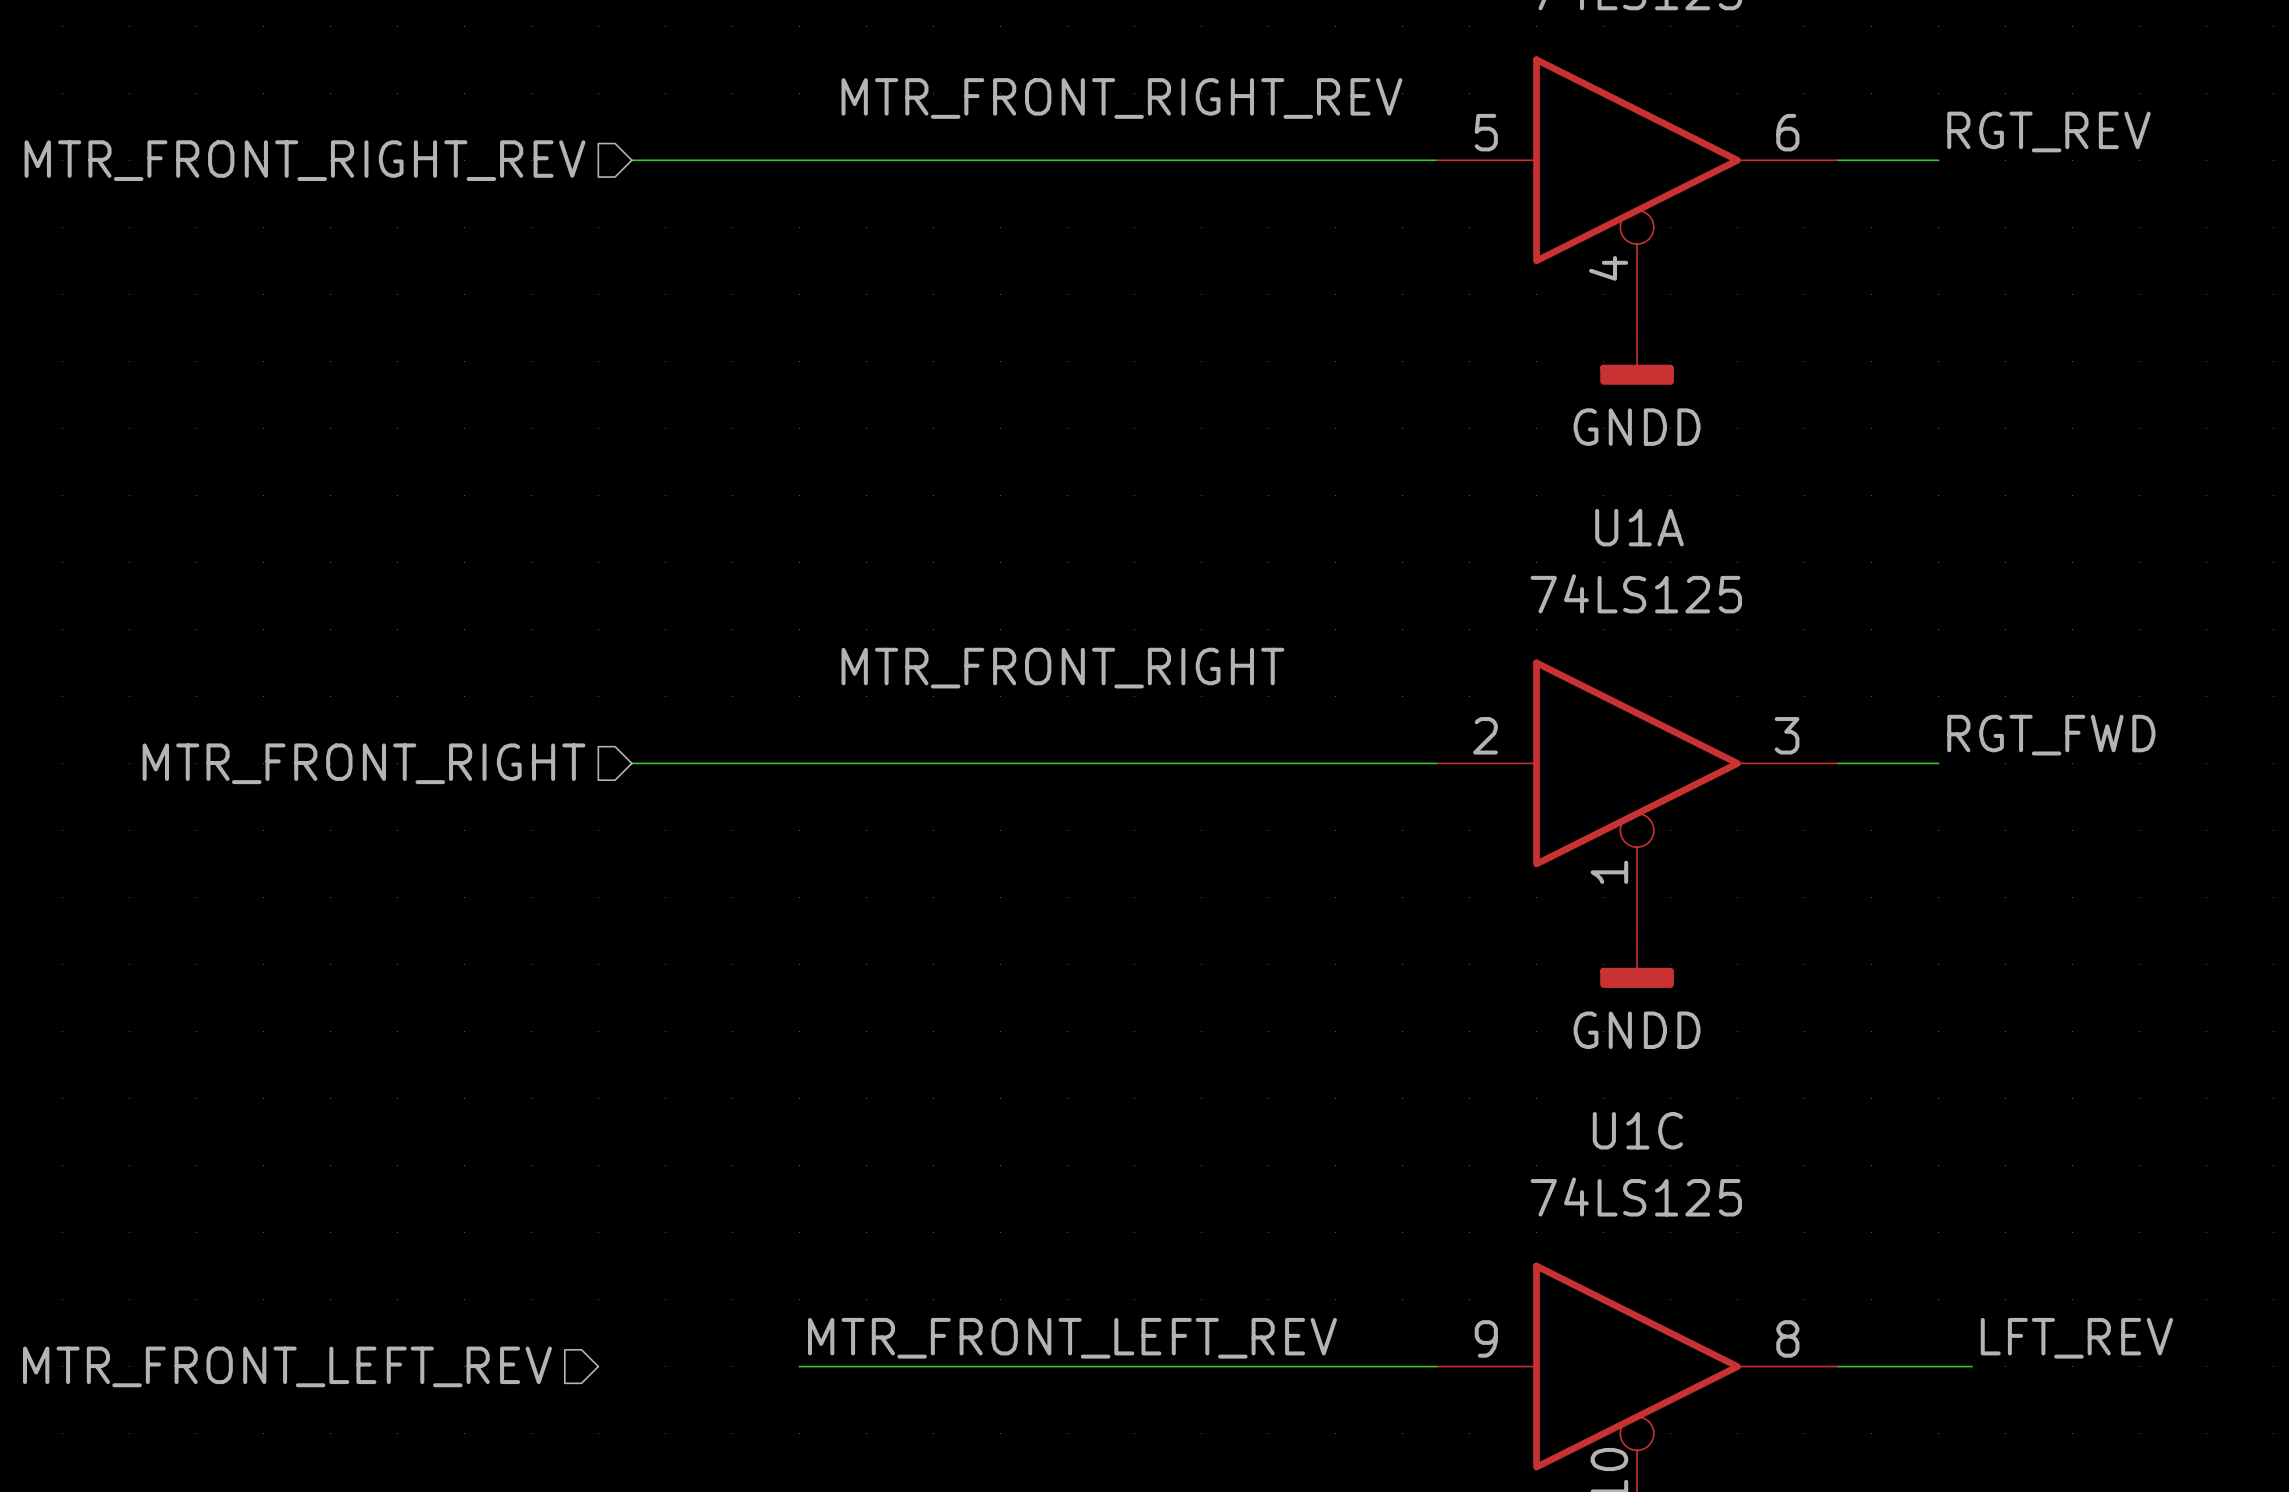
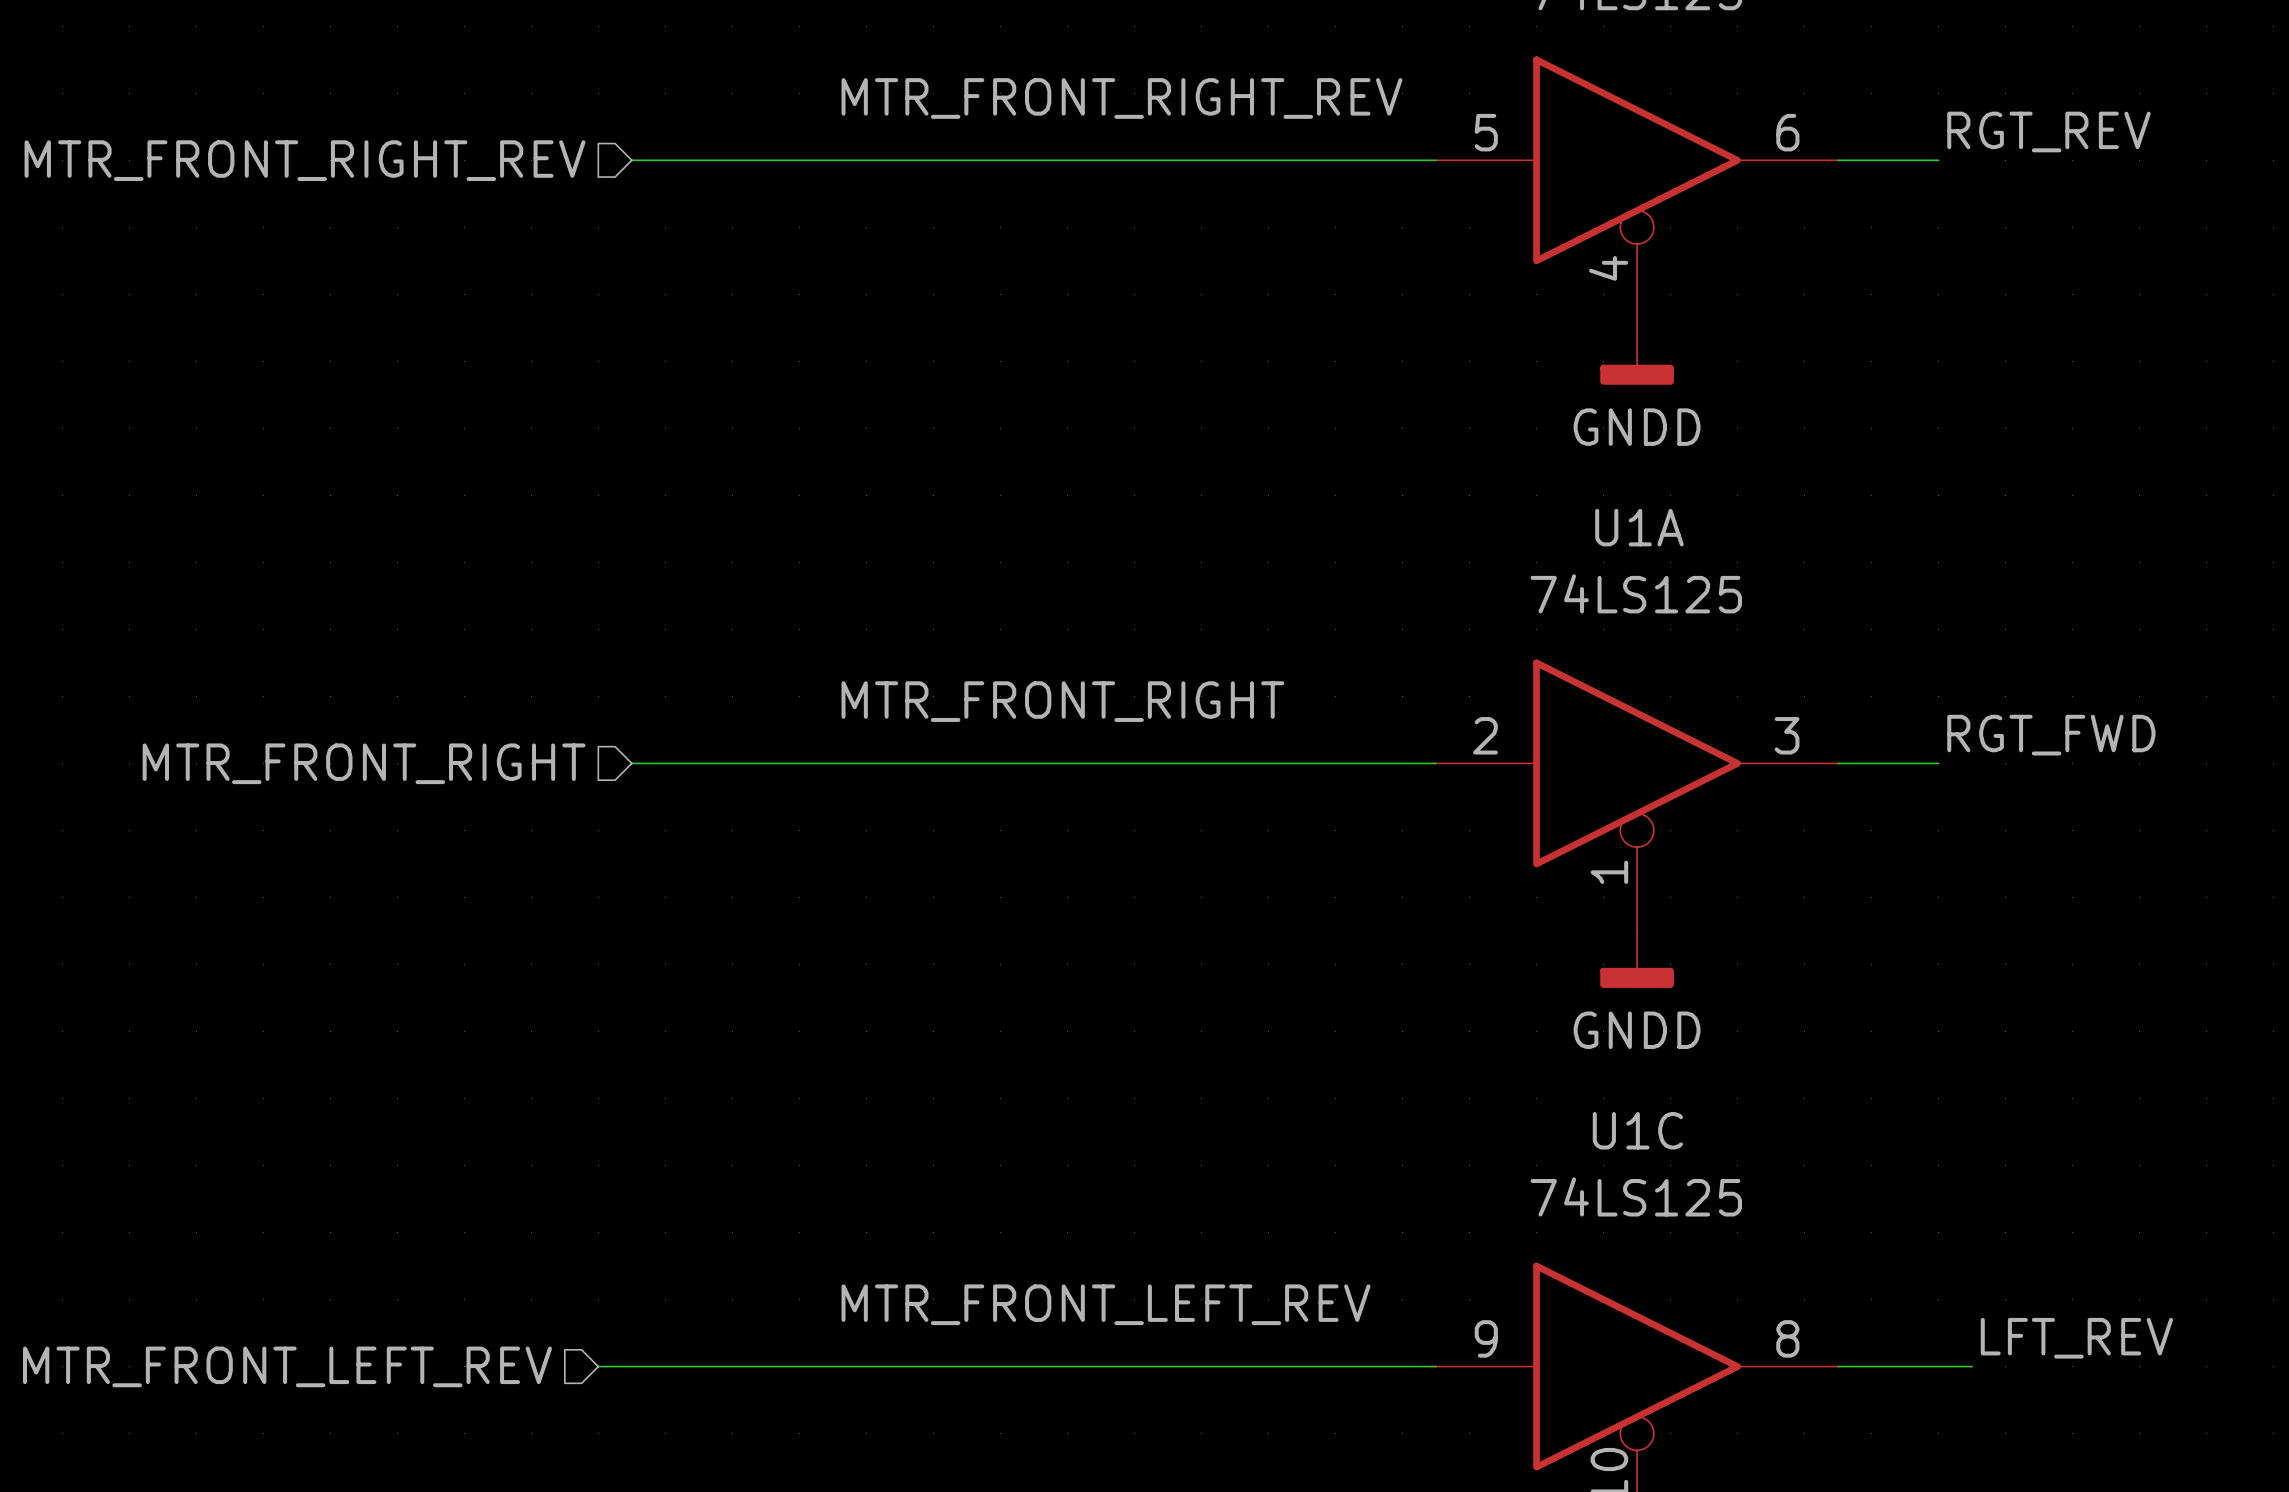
label position: MTR_FRONT_RIGHT (1062, 668) -> MTR_FRONT_RIGHT (1062, 701)
label position: MTR_FRONT_LEFT_REV (1072, 1338) -> MTR_FRONT_LEFT_REV (1105, 1304)
wire: none -> (598, 1366) (799, 1366)

